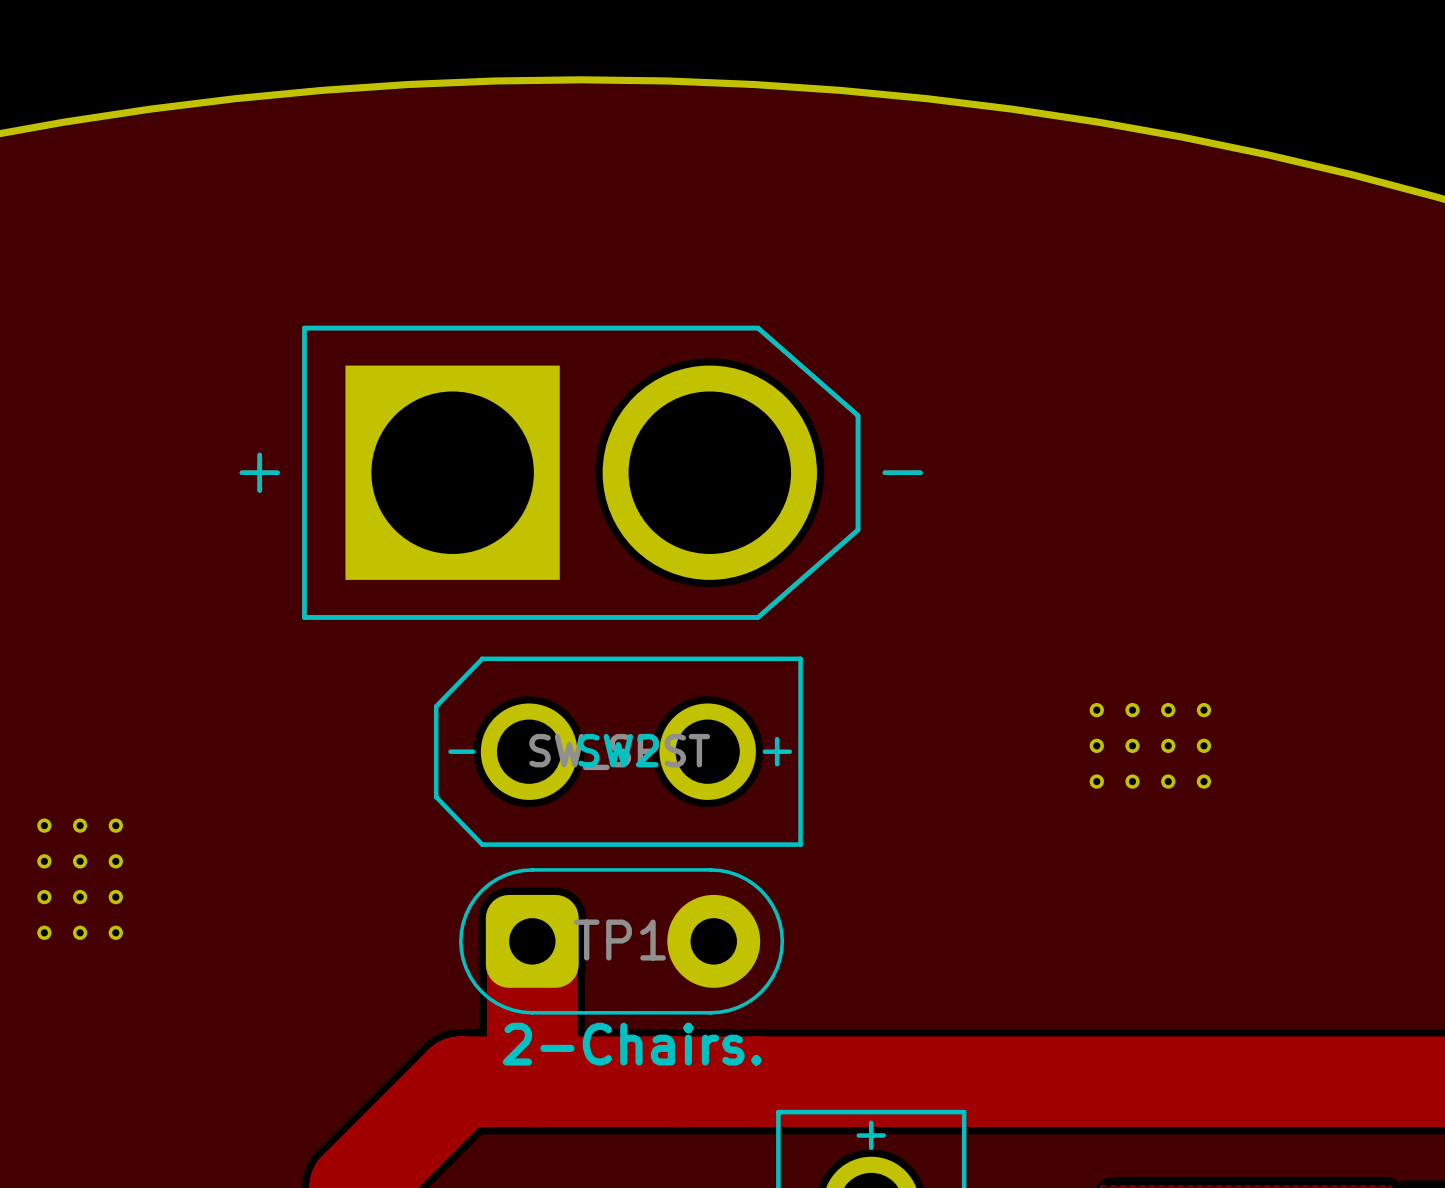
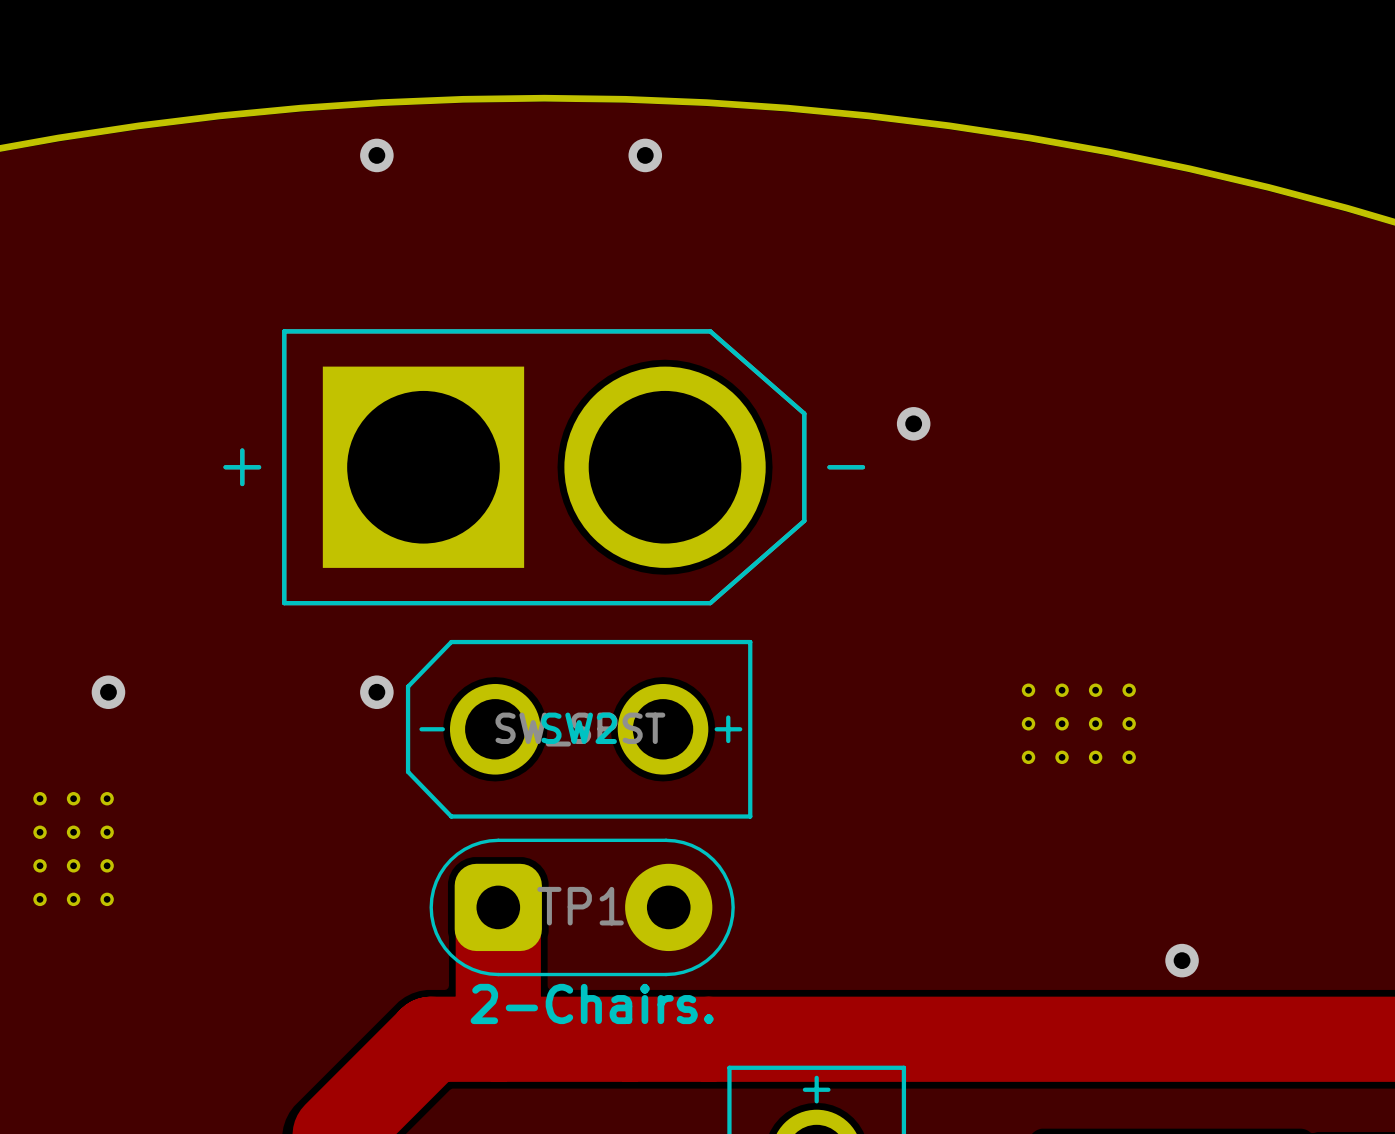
via: none -> (376, 155)
via: none -> (645, 155)
via: none -> (913, 423)
via: none -> (108, 692)
via: none -> (376, 692)
via: none -> (1182, 960)

